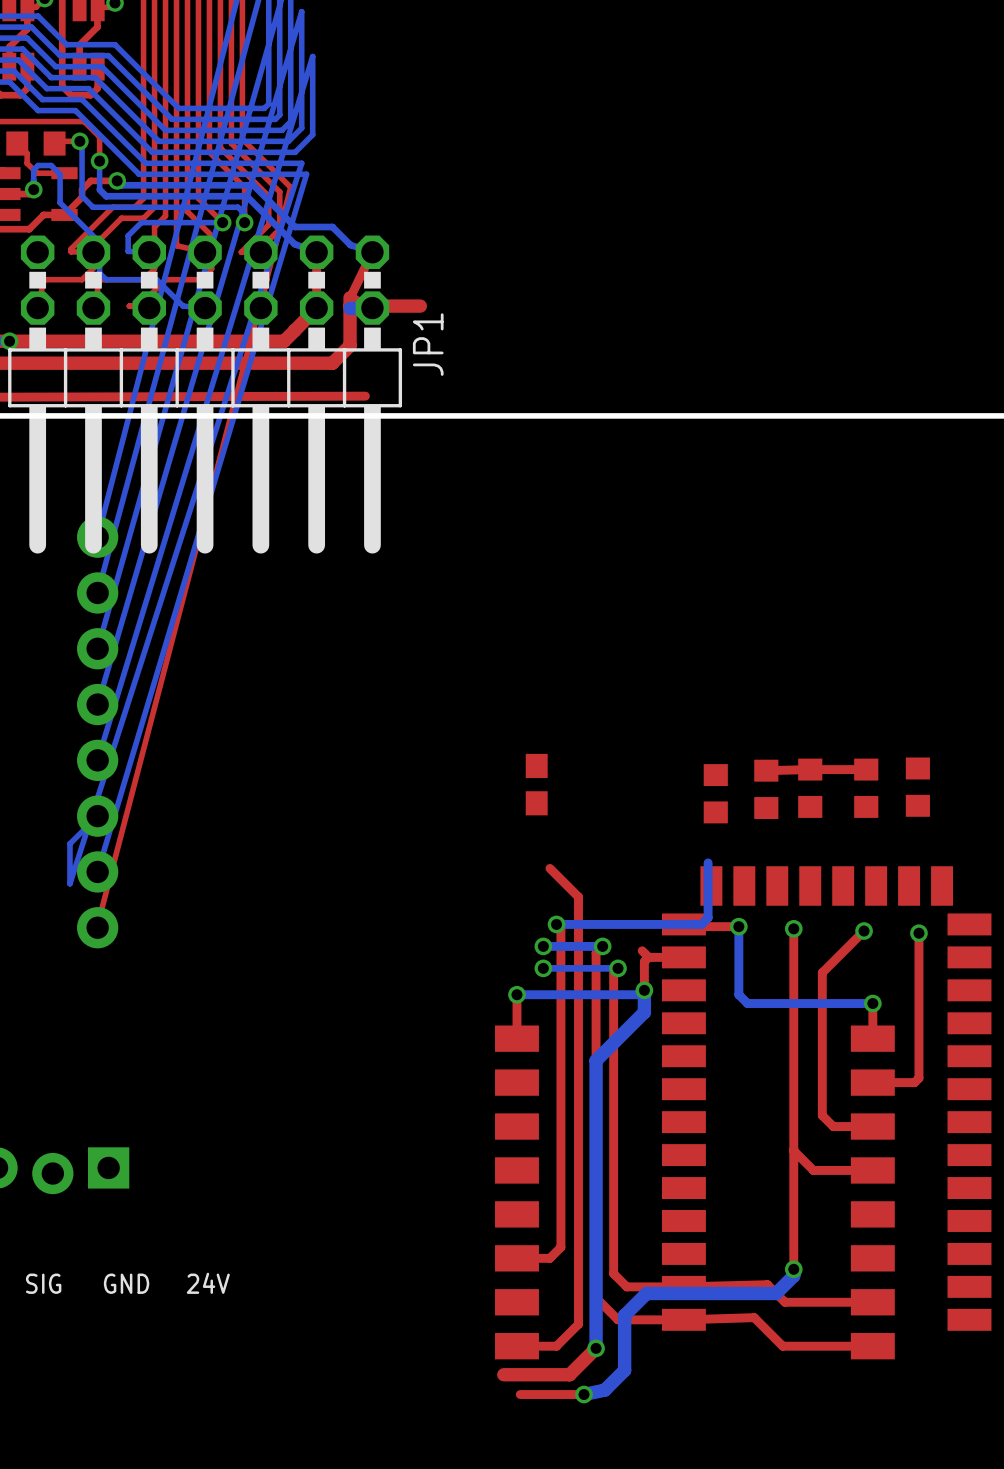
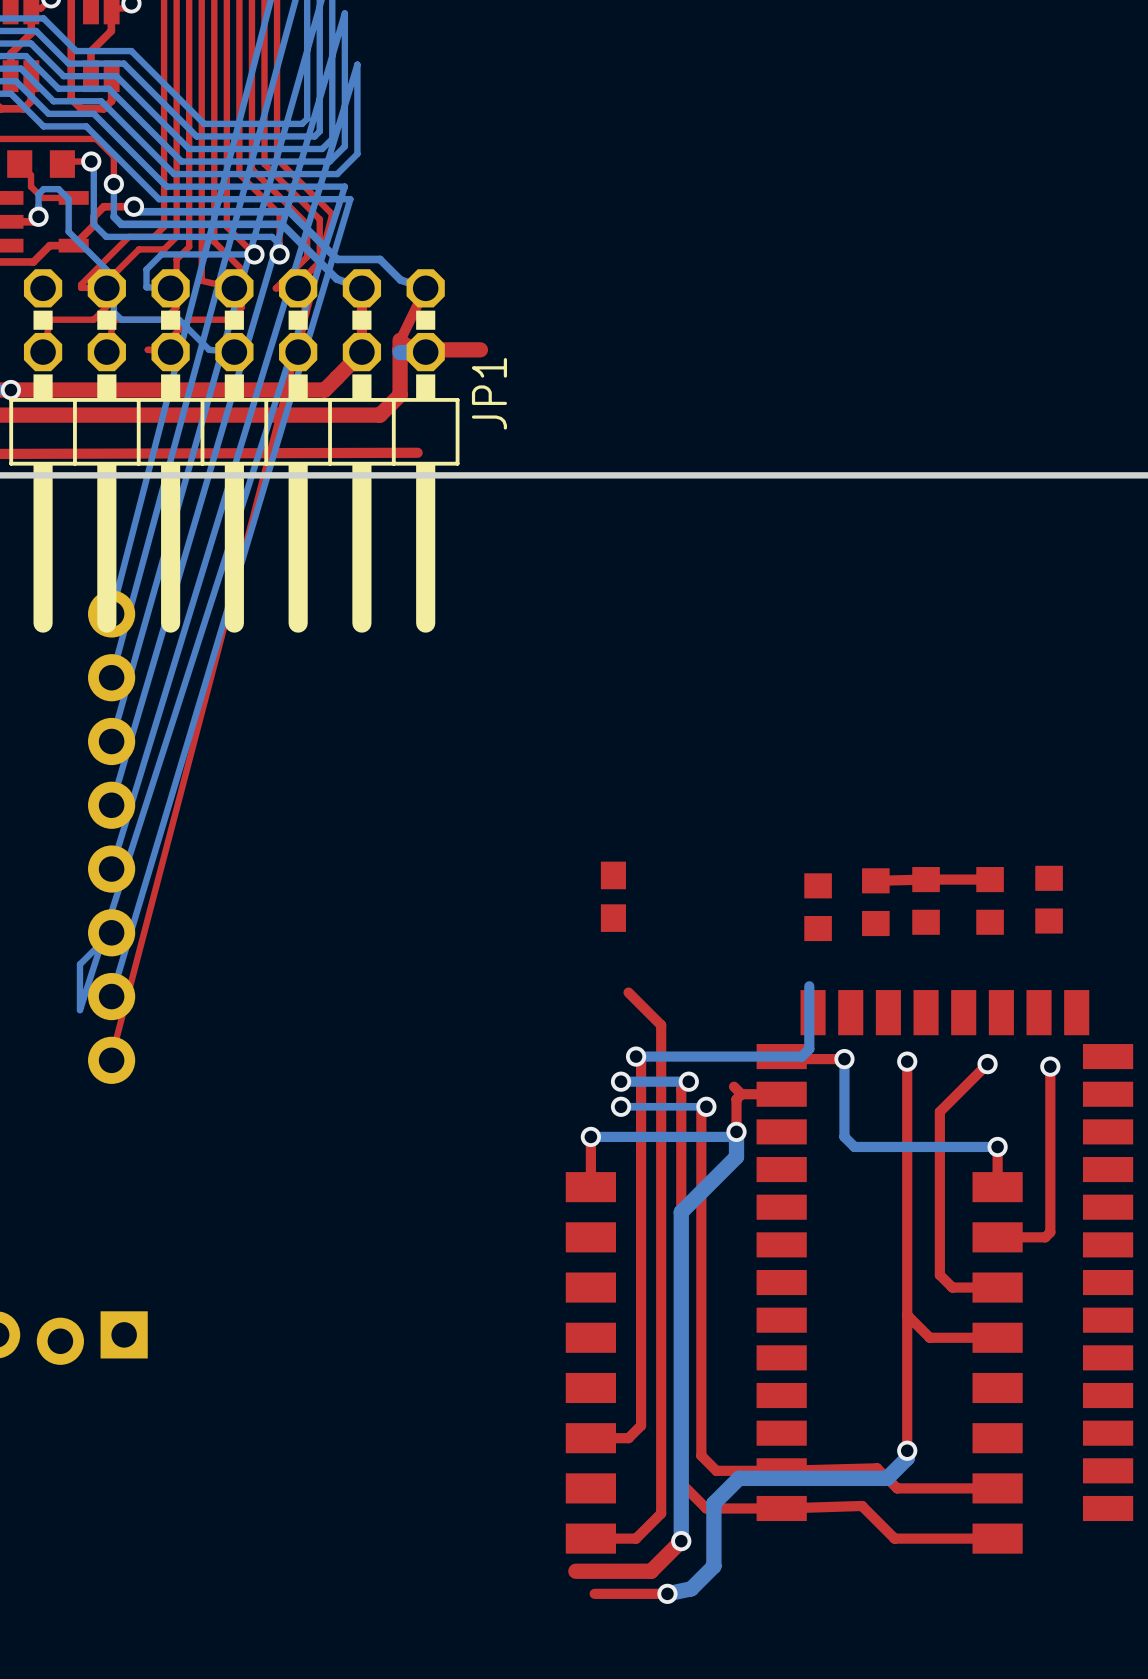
text: SIG (43, 1283) -> none
text: GND (126, 1283) -> none
text: 24V (208, 1283) -> none

